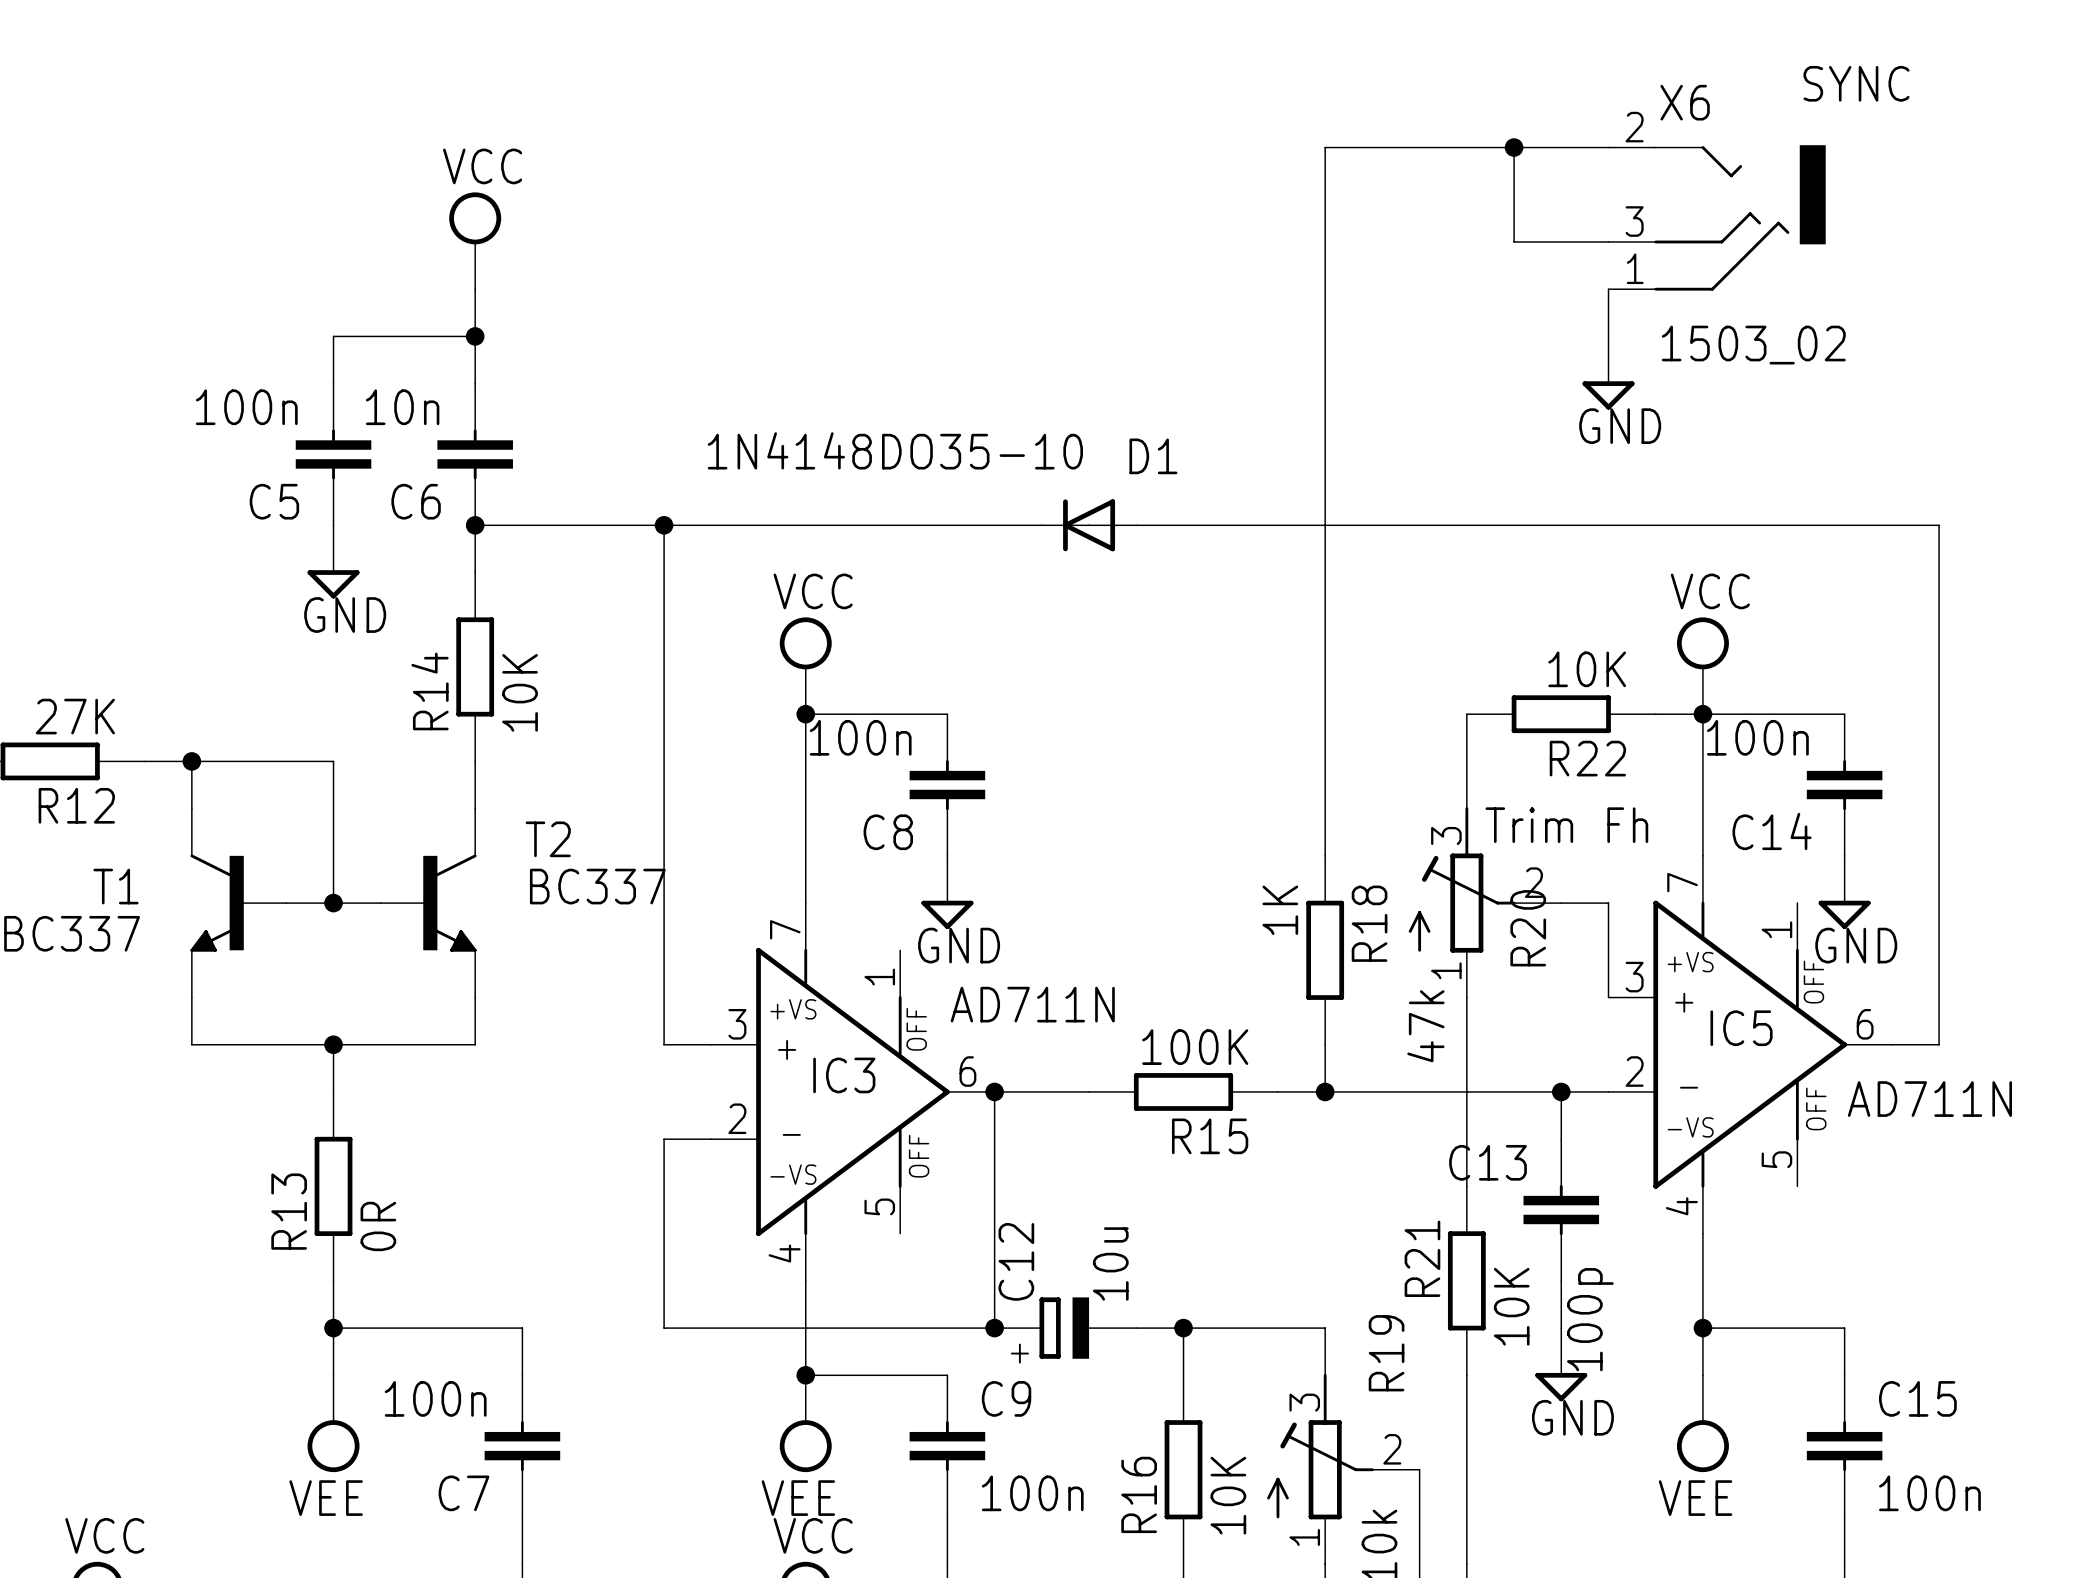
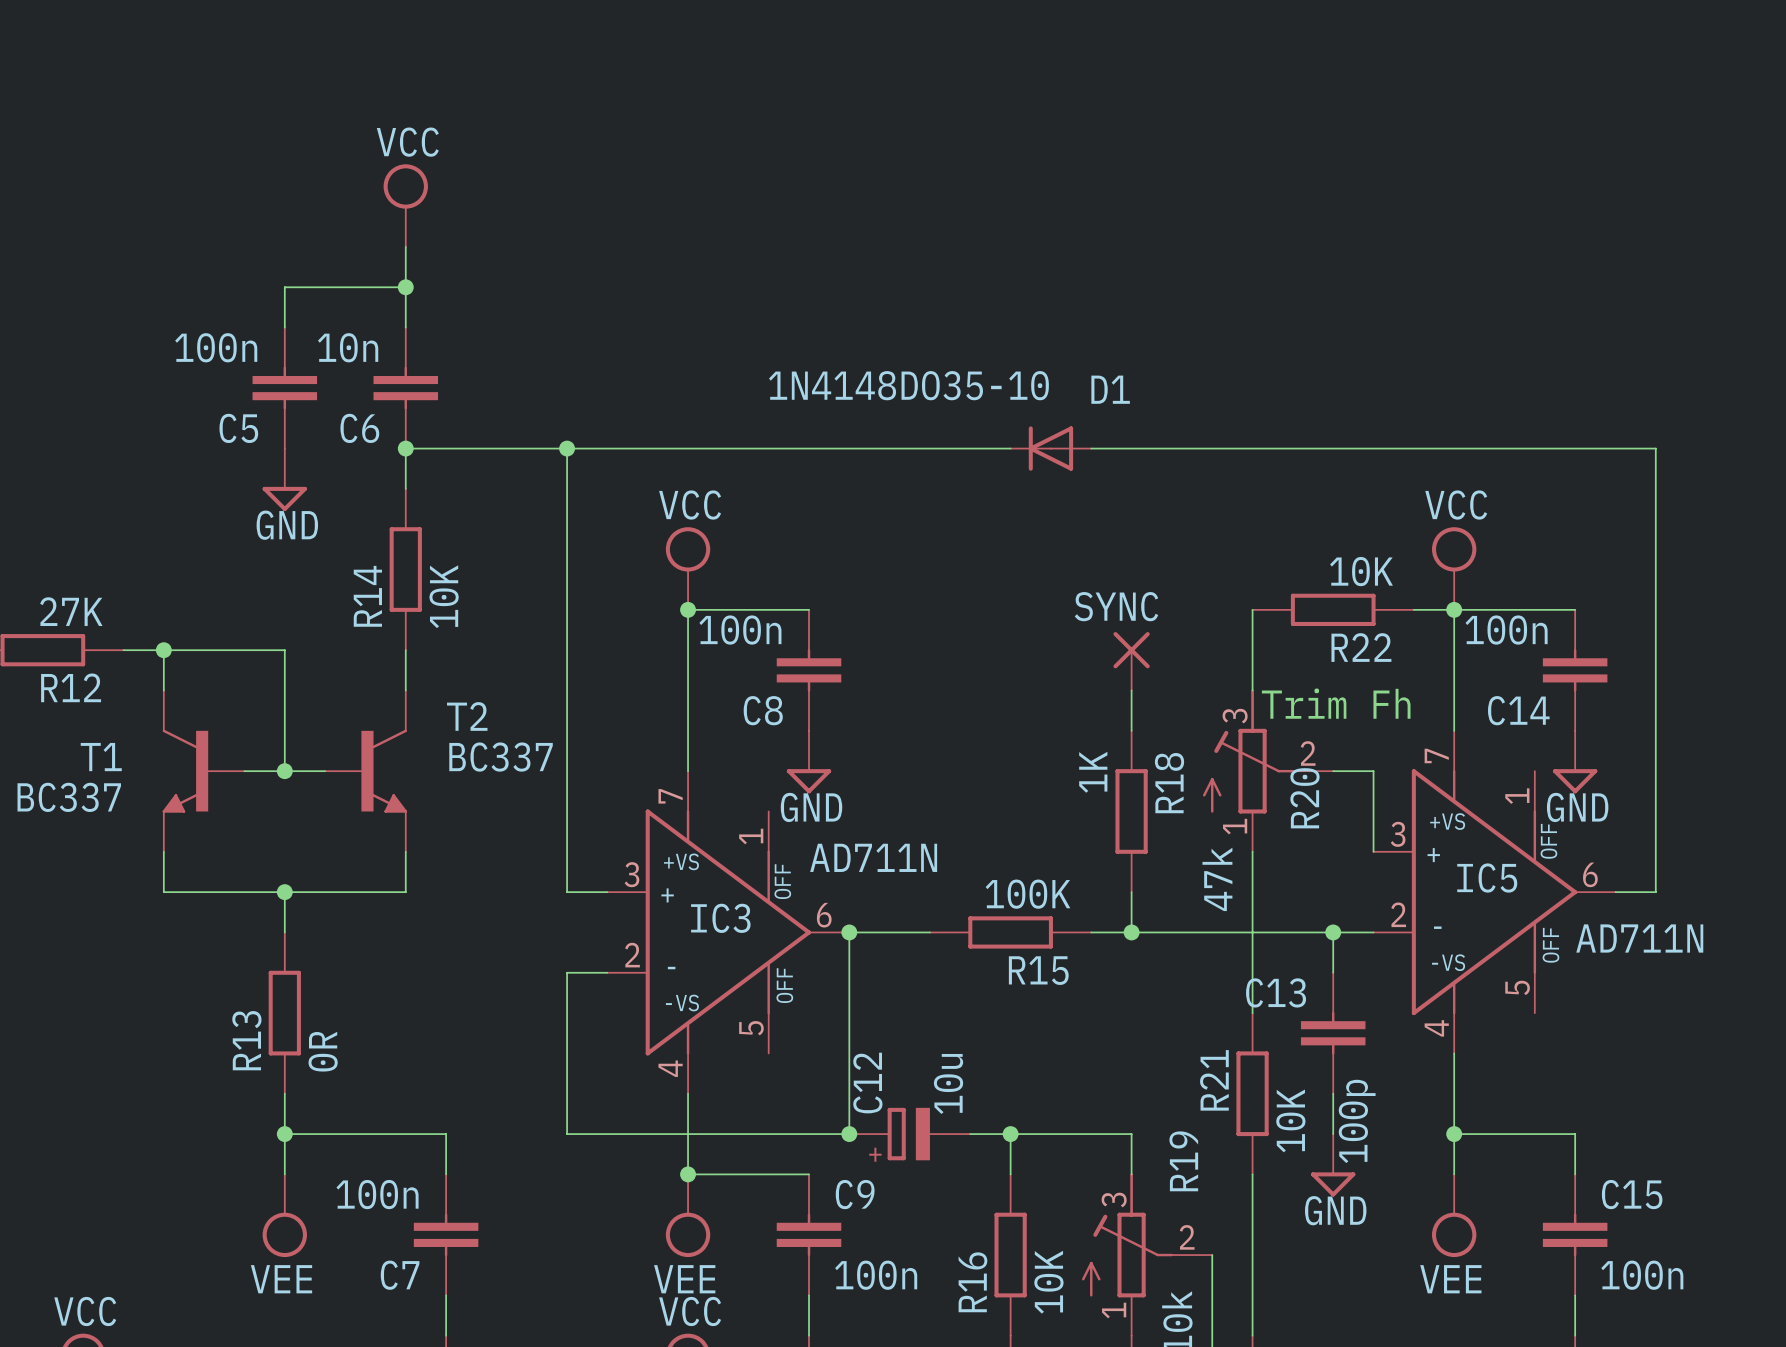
text: SYNC (1856, 83) -> none
wire: (1514, 147) (1514, 241) (1608, 241) -> none
junction: (1514, 147) -> none
wire: (1608, 147) (1325, 147) (1325, 808) -> none
X6: 1503_02 (1717, 217) -> none
wire: (1608, 289) (1608, 336) -> none
power symbol: GND (1608, 373) -> none
D1 position: (1089, 525) -> (1050, 448)
SYNC: none -> (1131, 661)

